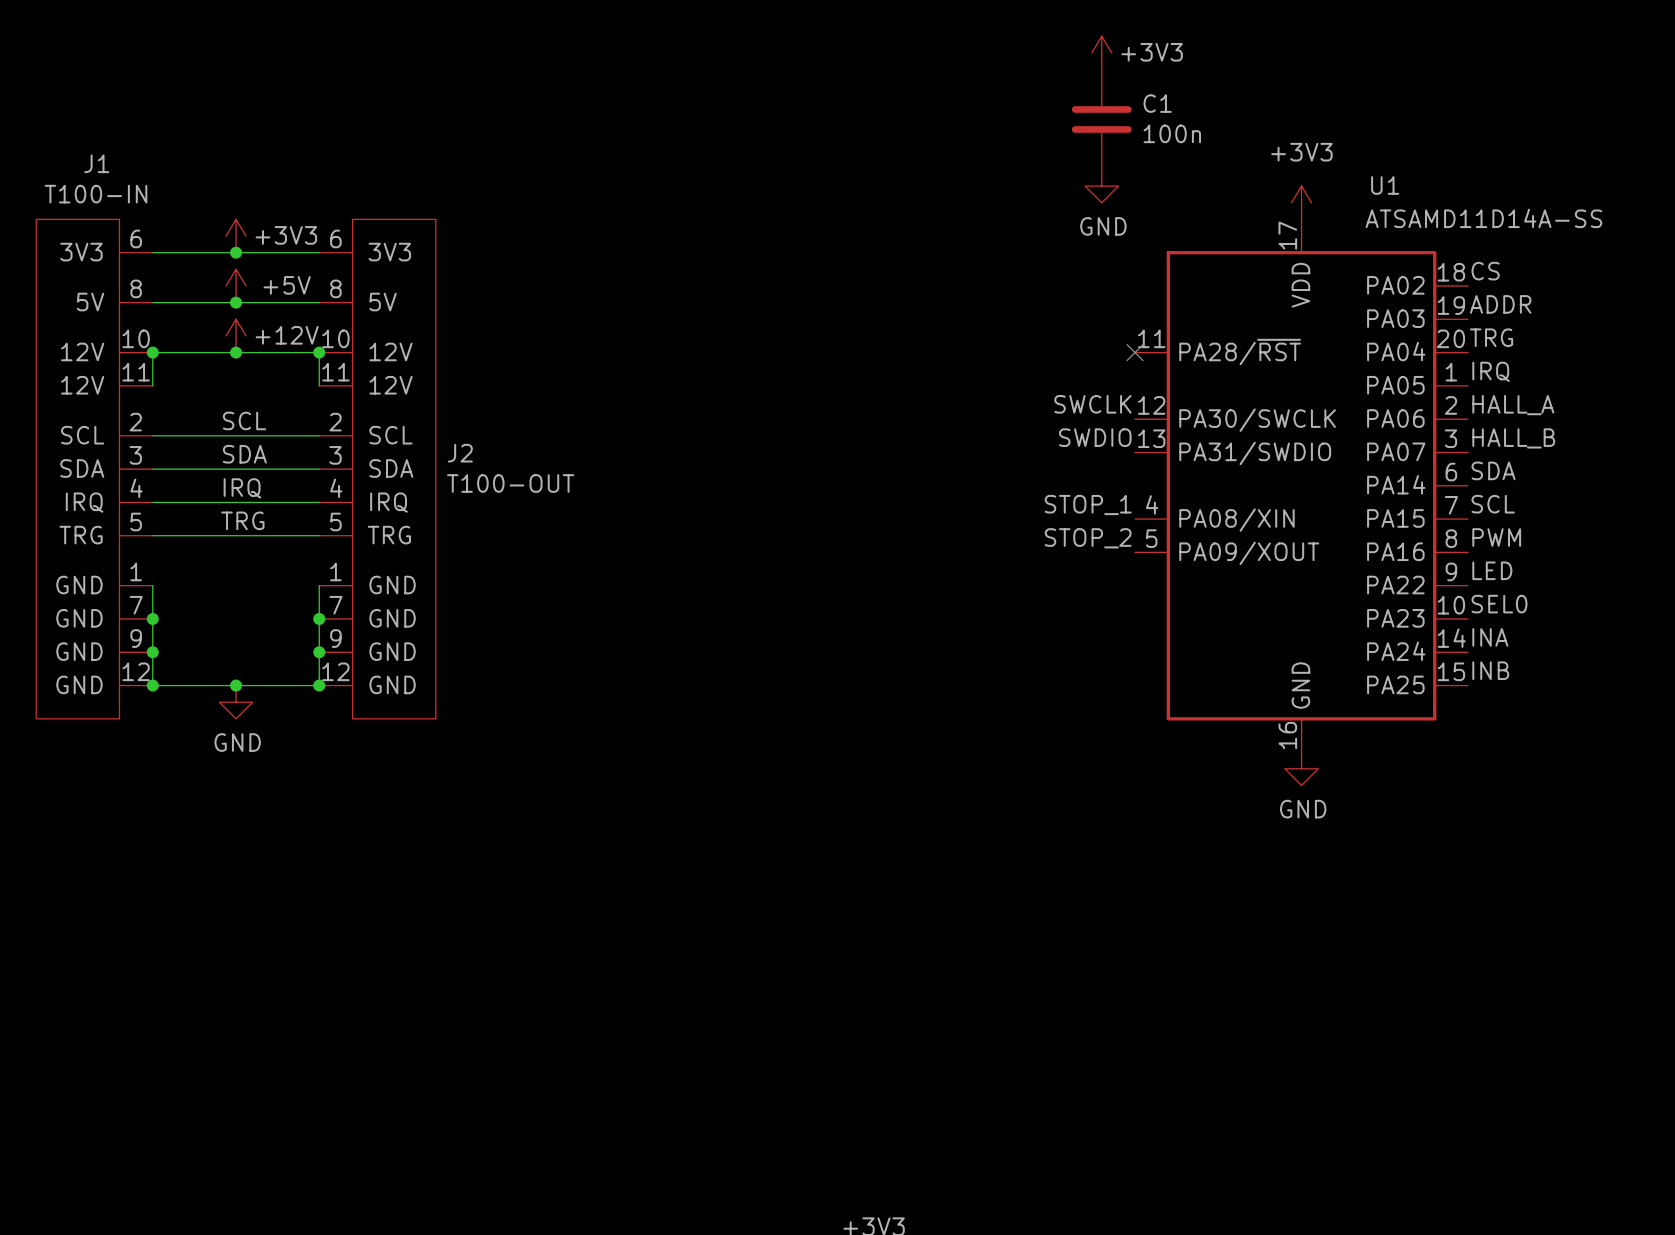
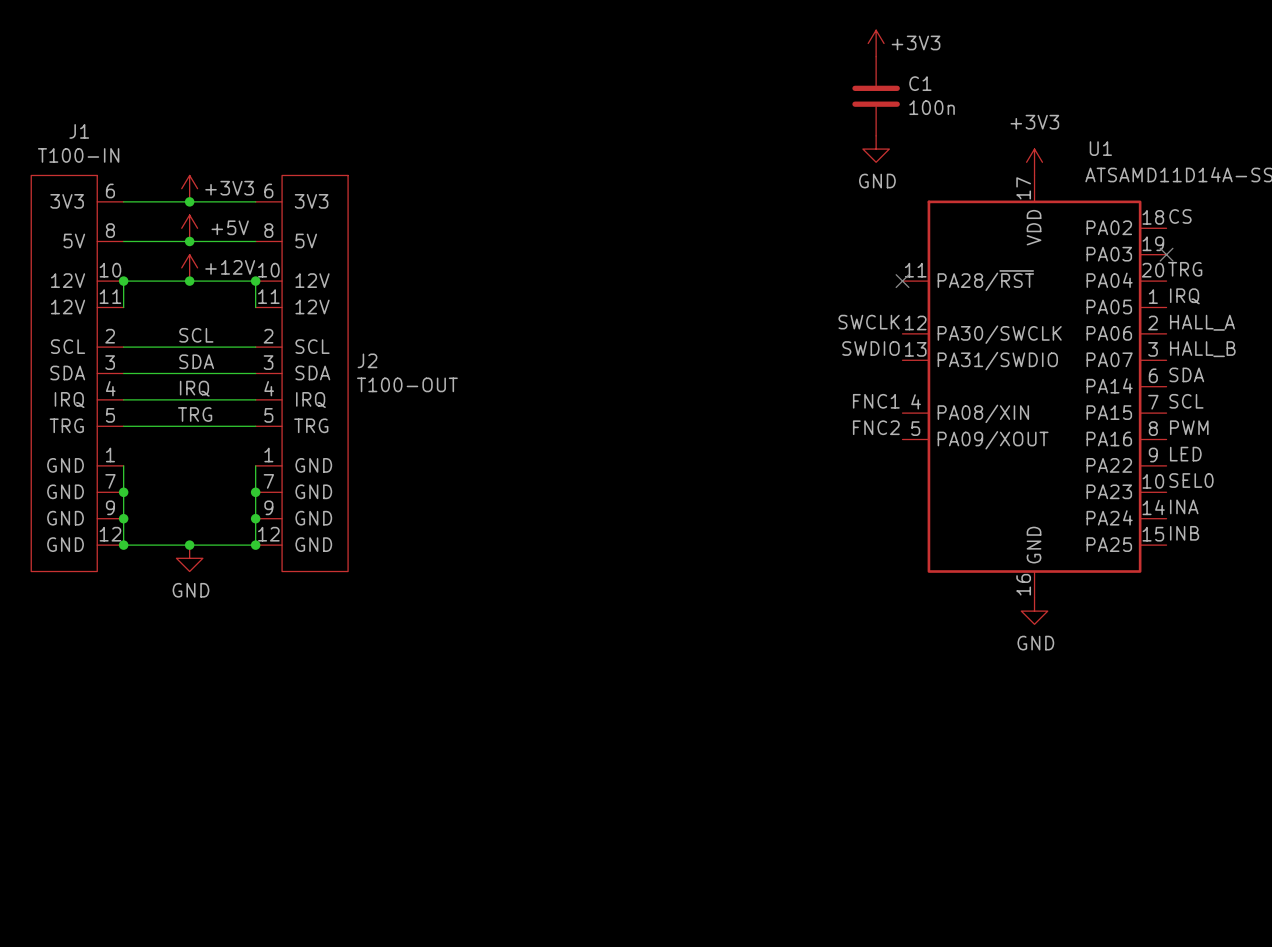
label: ADDR (1500, 304) -> none
no-connect mark: none -> (1166, 254)
label: STOP_1 (1088, 505) -> FNC1 (876, 401)
label: STOP_2 (1088, 538) -> FNC2 (876, 427)

